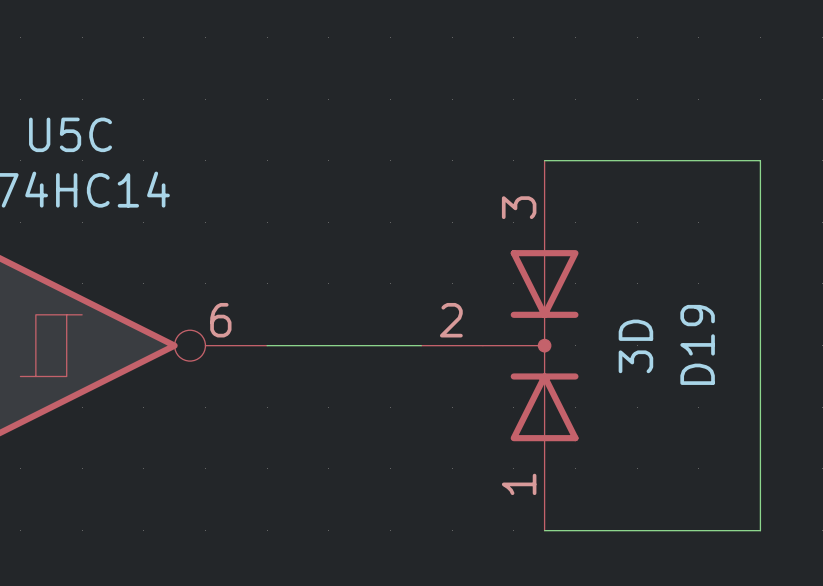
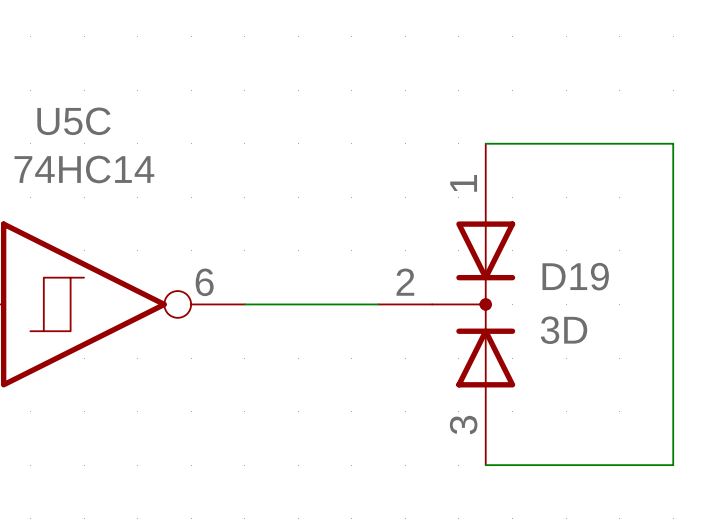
D19 name position: D19 (697, 344) -> D19 (575, 276)
D19 flip: as is (530, 345) -> up-down (473, 304)

